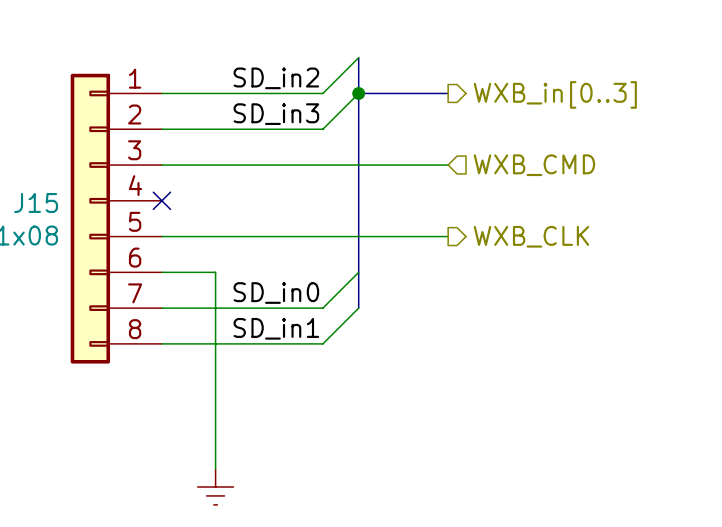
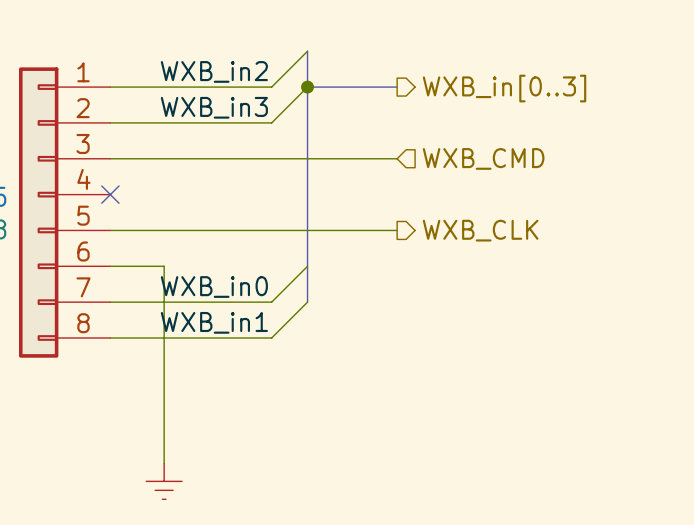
label: SD_in2 (276, 78) -> WXB_in2 (214, 71)
label: SD_in3 (276, 114) -> WXB_in3 (214, 107)
label: SD_in0 (276, 293) -> WXB_in0 (214, 287)
label: SD_in1 (276, 328) -> WXB_in1 (214, 322)

